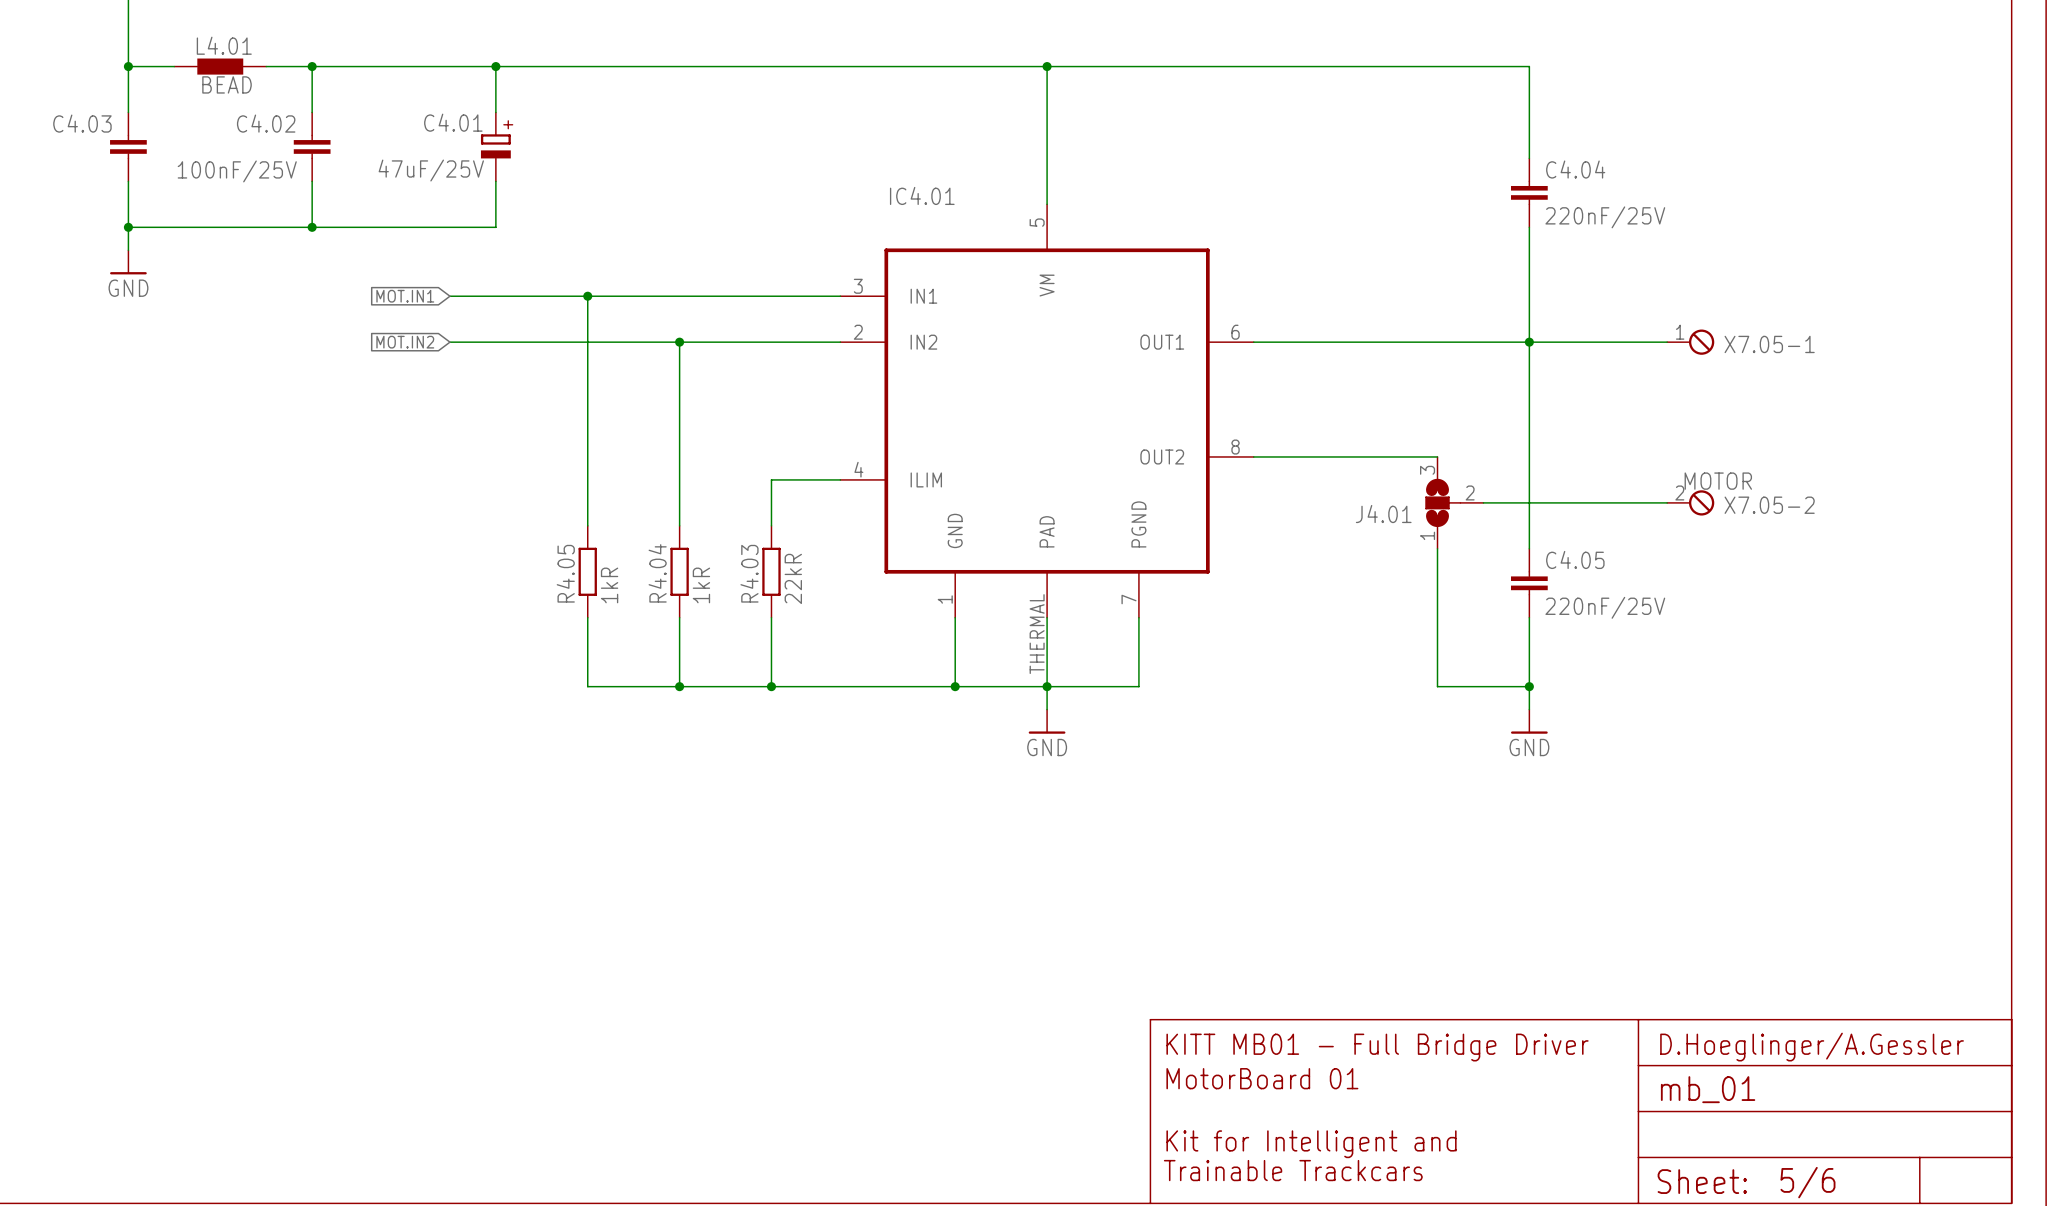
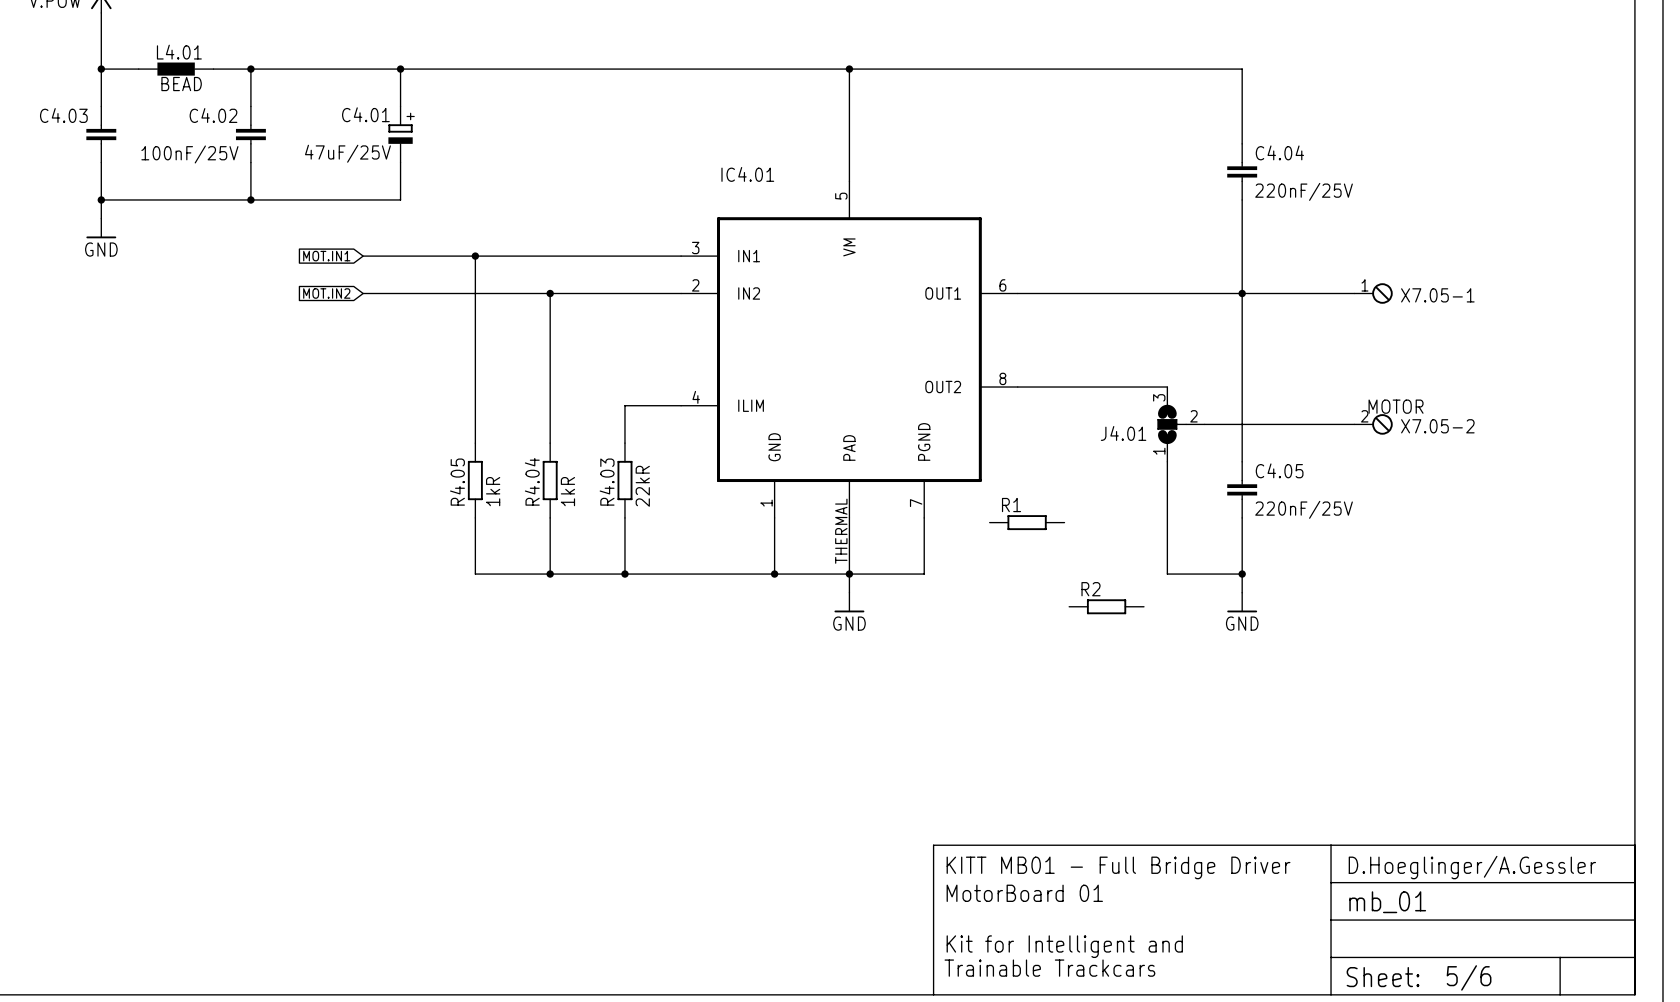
R1: none -> (1027, 522)
R2: none -> (1106, 606)

